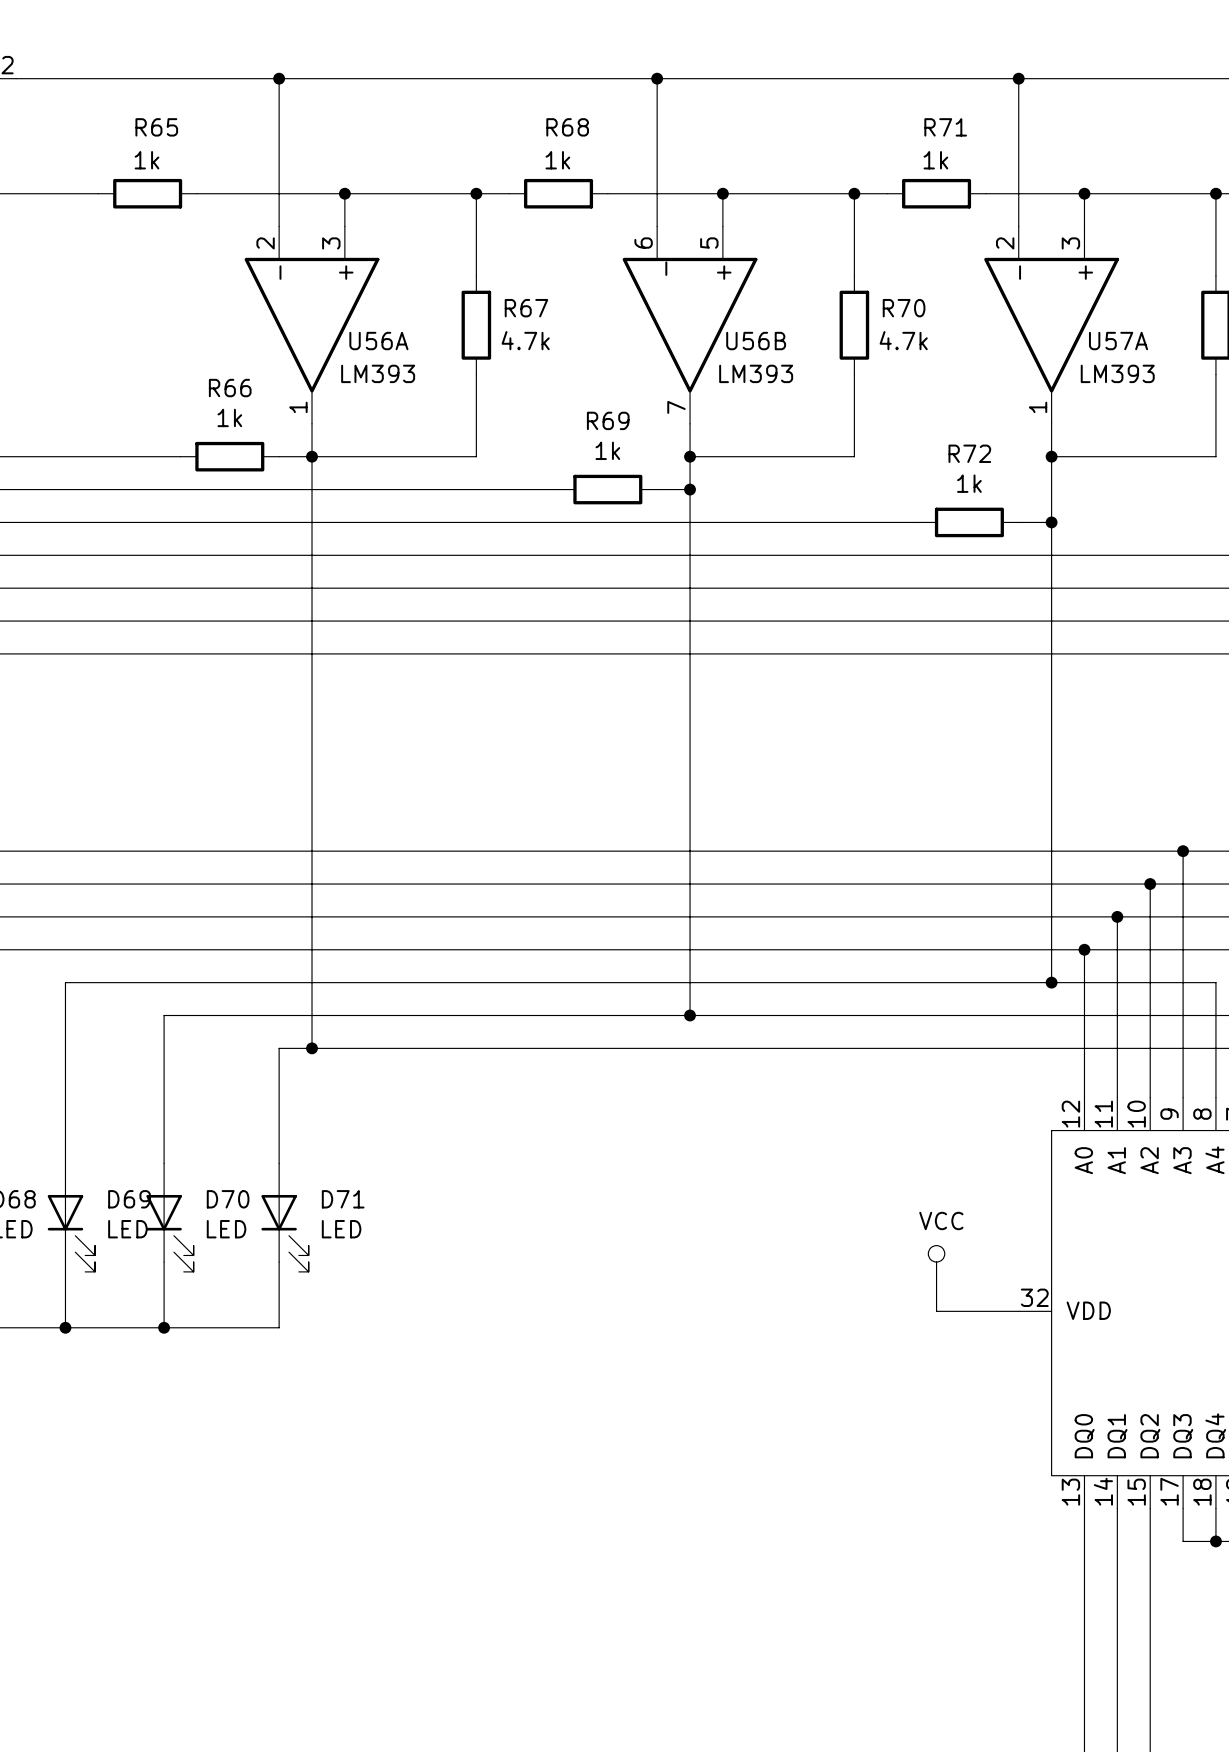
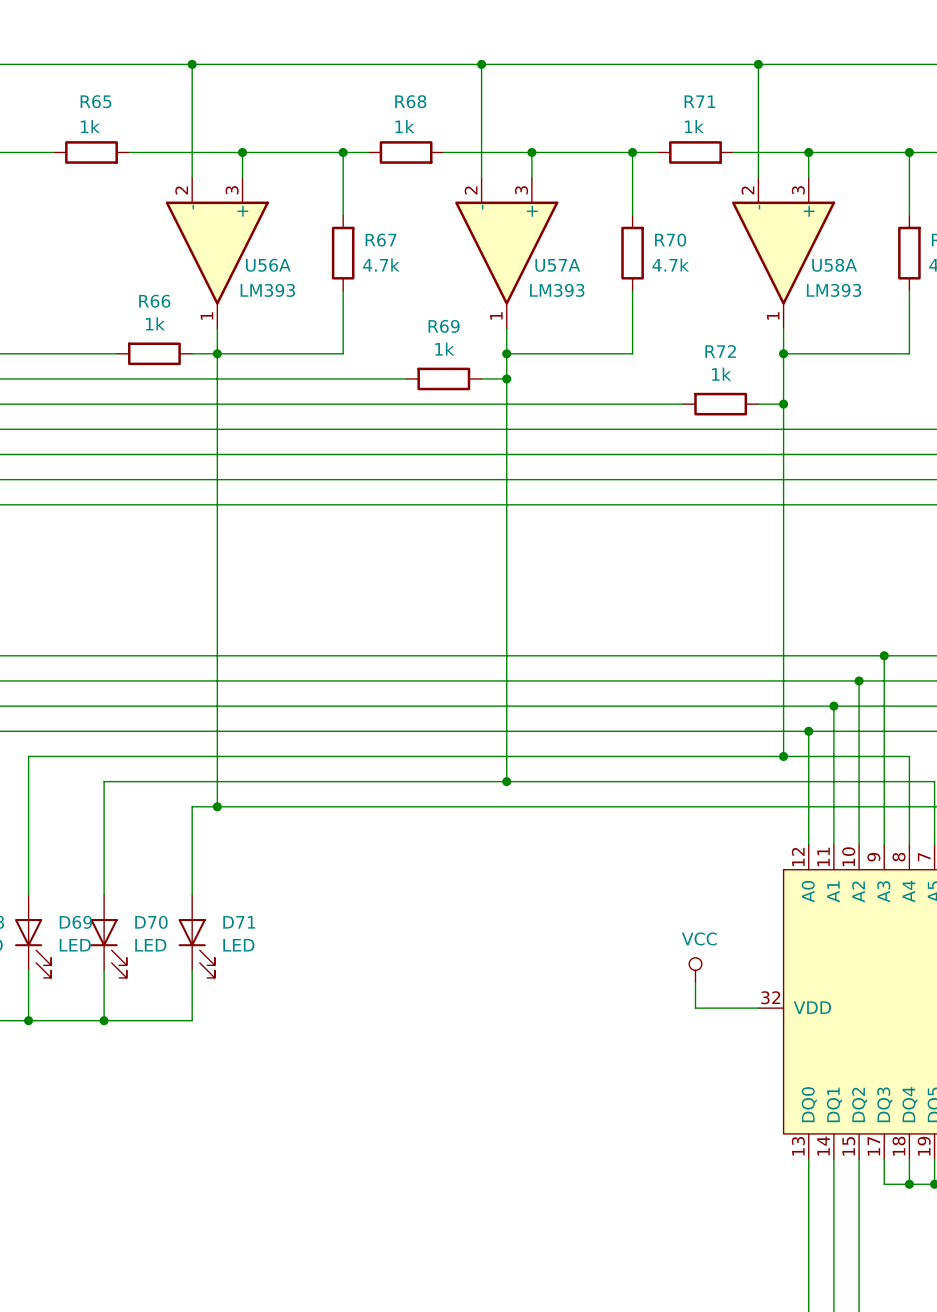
U56B pin number: 6 (643, 243) -> 2 (471, 190)
U56B pin number: 5 (709, 243) -> 3 (521, 190)
U56B pin name: _ (666, 268) -> - (482, 207)
U56B name: U56B (756, 341) -> U57A (557, 265)
U57A name: U57A (1118, 341) -> U58A (834, 265)
U56B pin number: 7 (676, 407) -> 1 (496, 315)

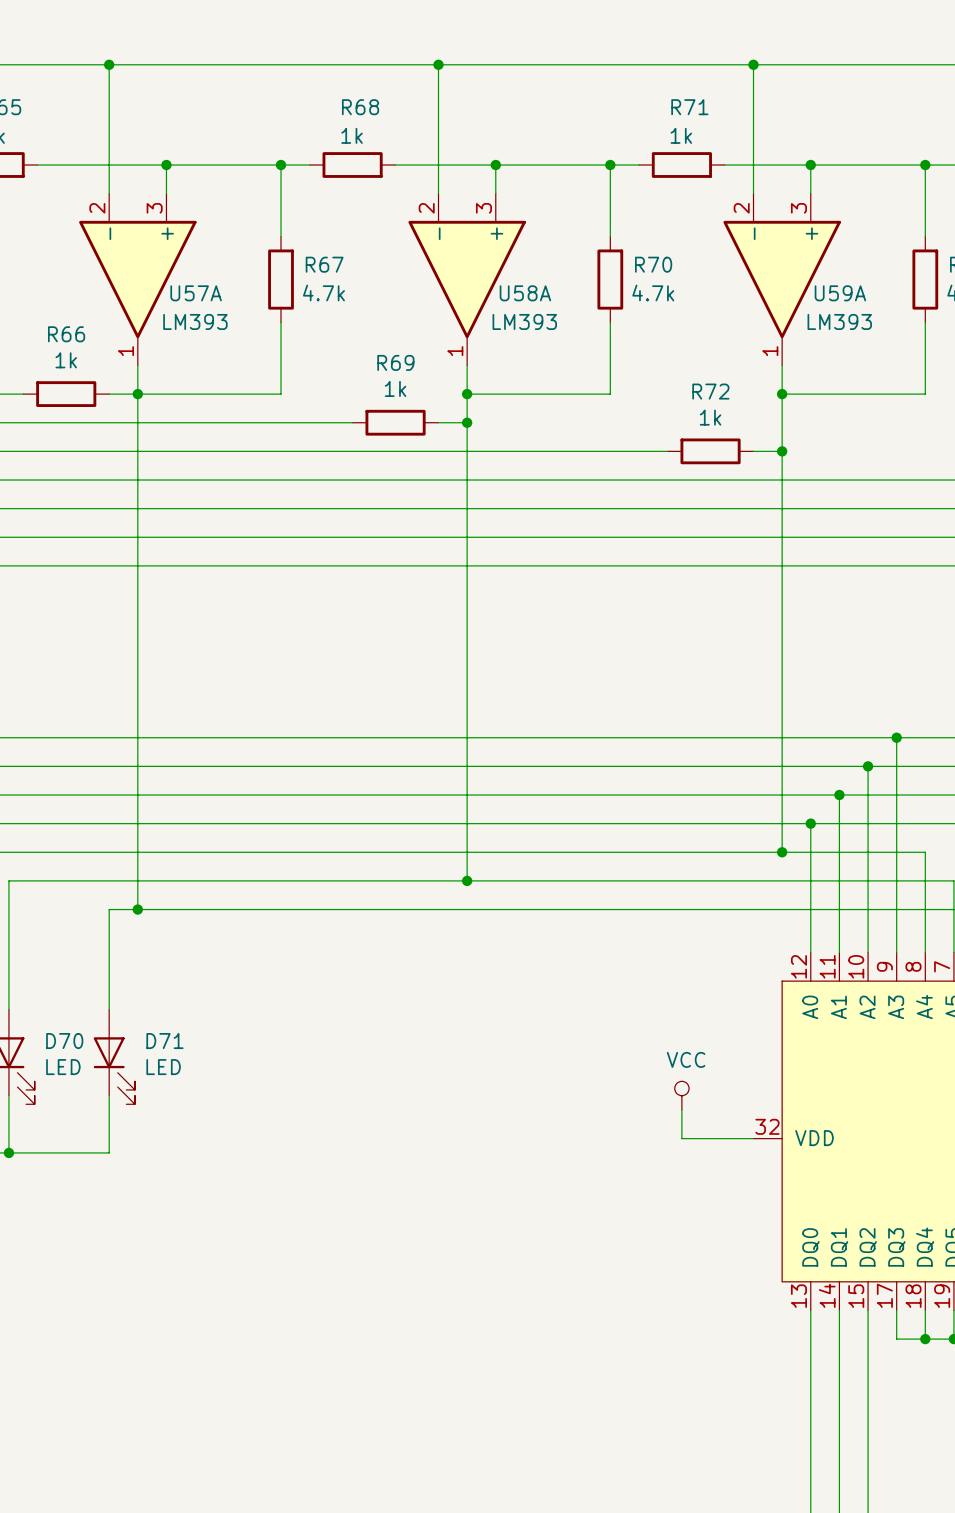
U56A name: U56A (268, 265) -> U57A (196, 293)
U57A name: U57A (557, 265) -> U58A (525, 293)
U58A name: U58A (834, 265) -> U59A (840, 293)

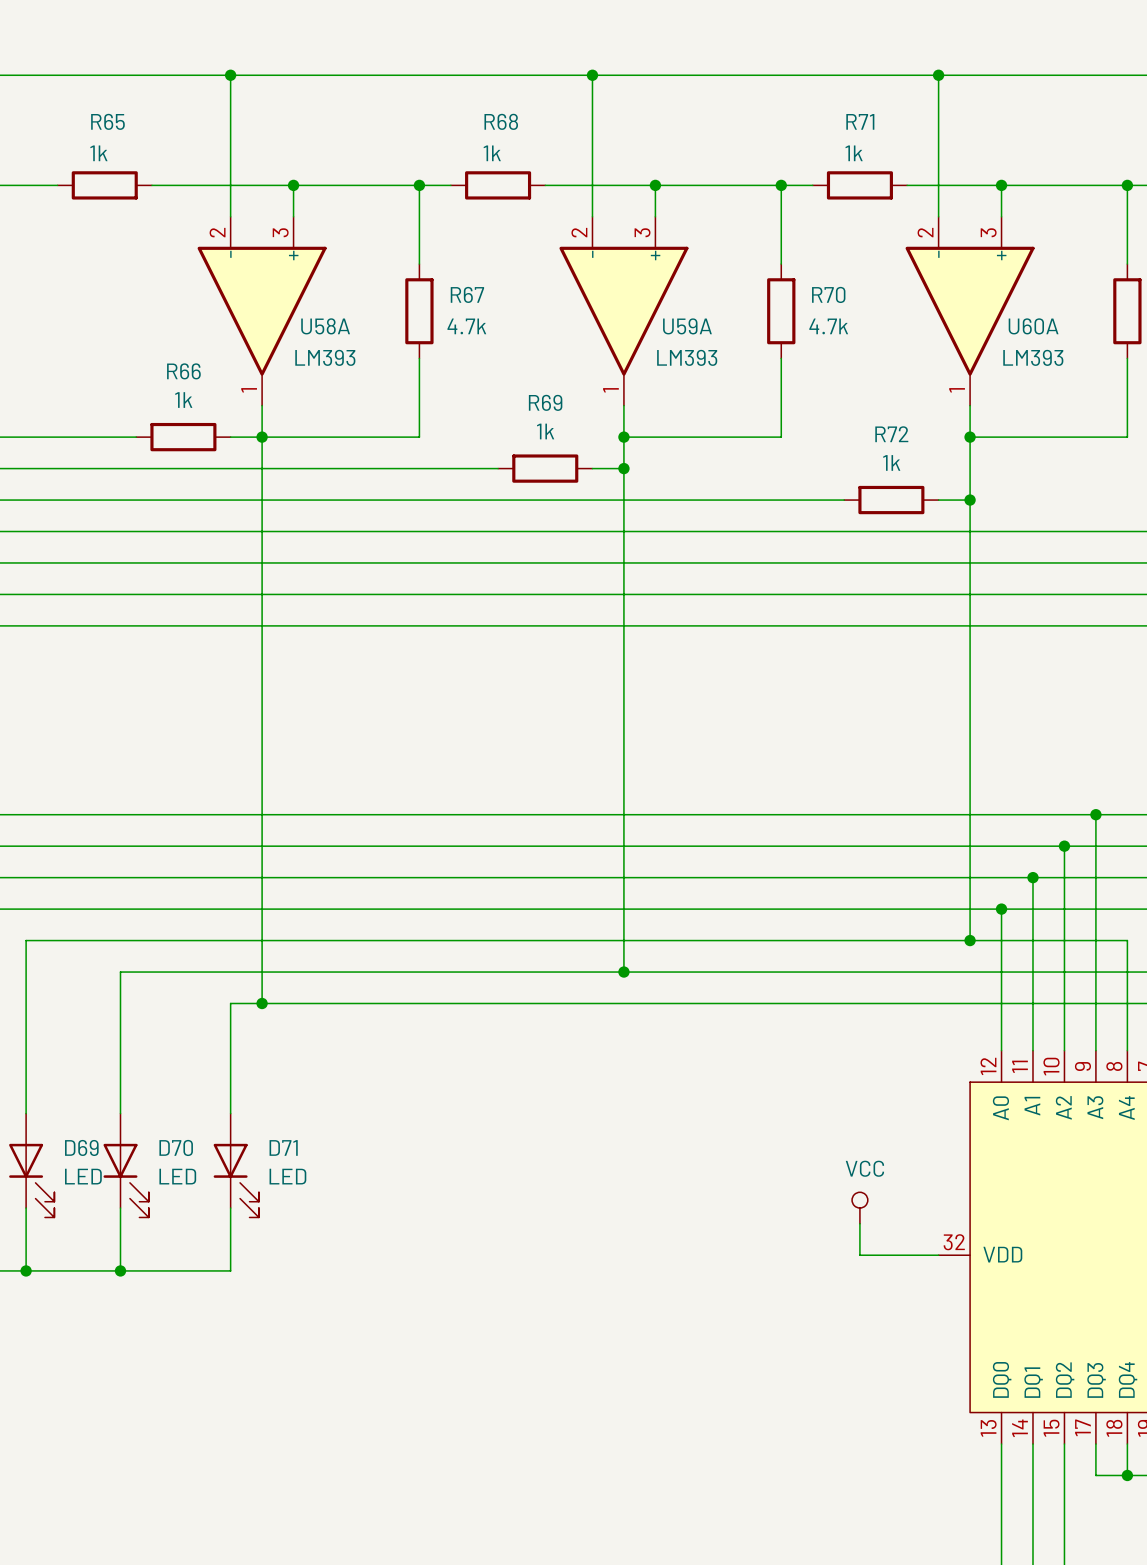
U57A name: U57A (196, 293) -> U58A (325, 326)
U58A name: U58A (525, 293) -> U59A (687, 326)
U59A name: U59A (840, 293) -> U60A (1033, 326)

